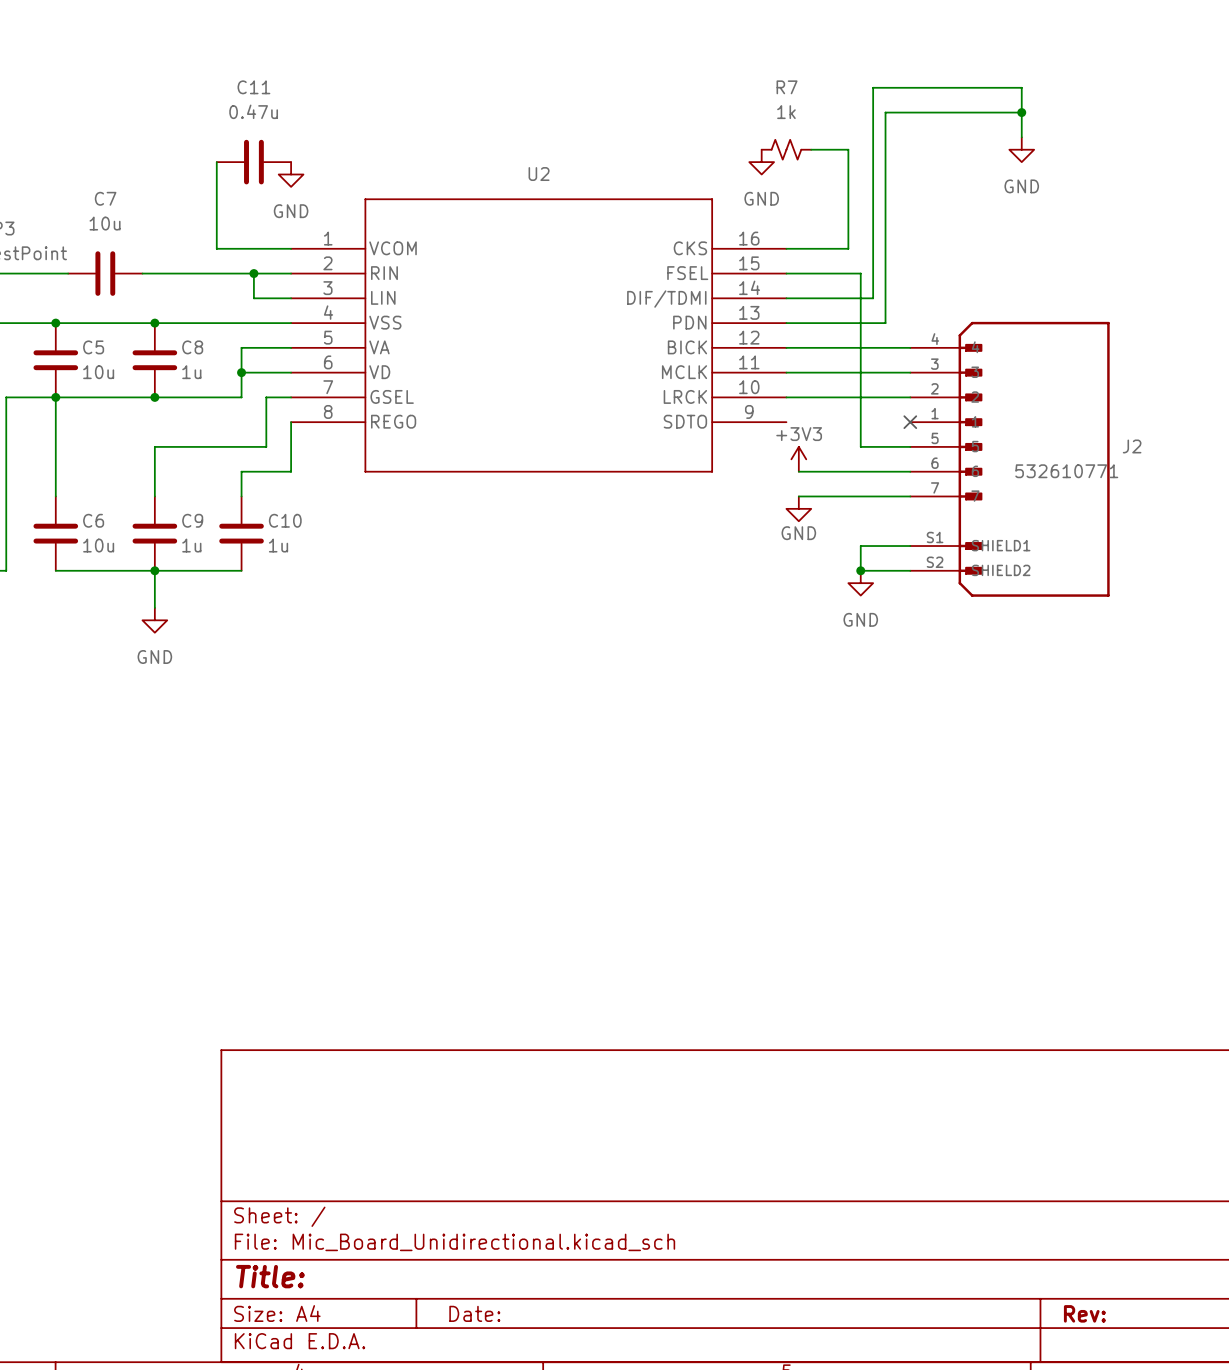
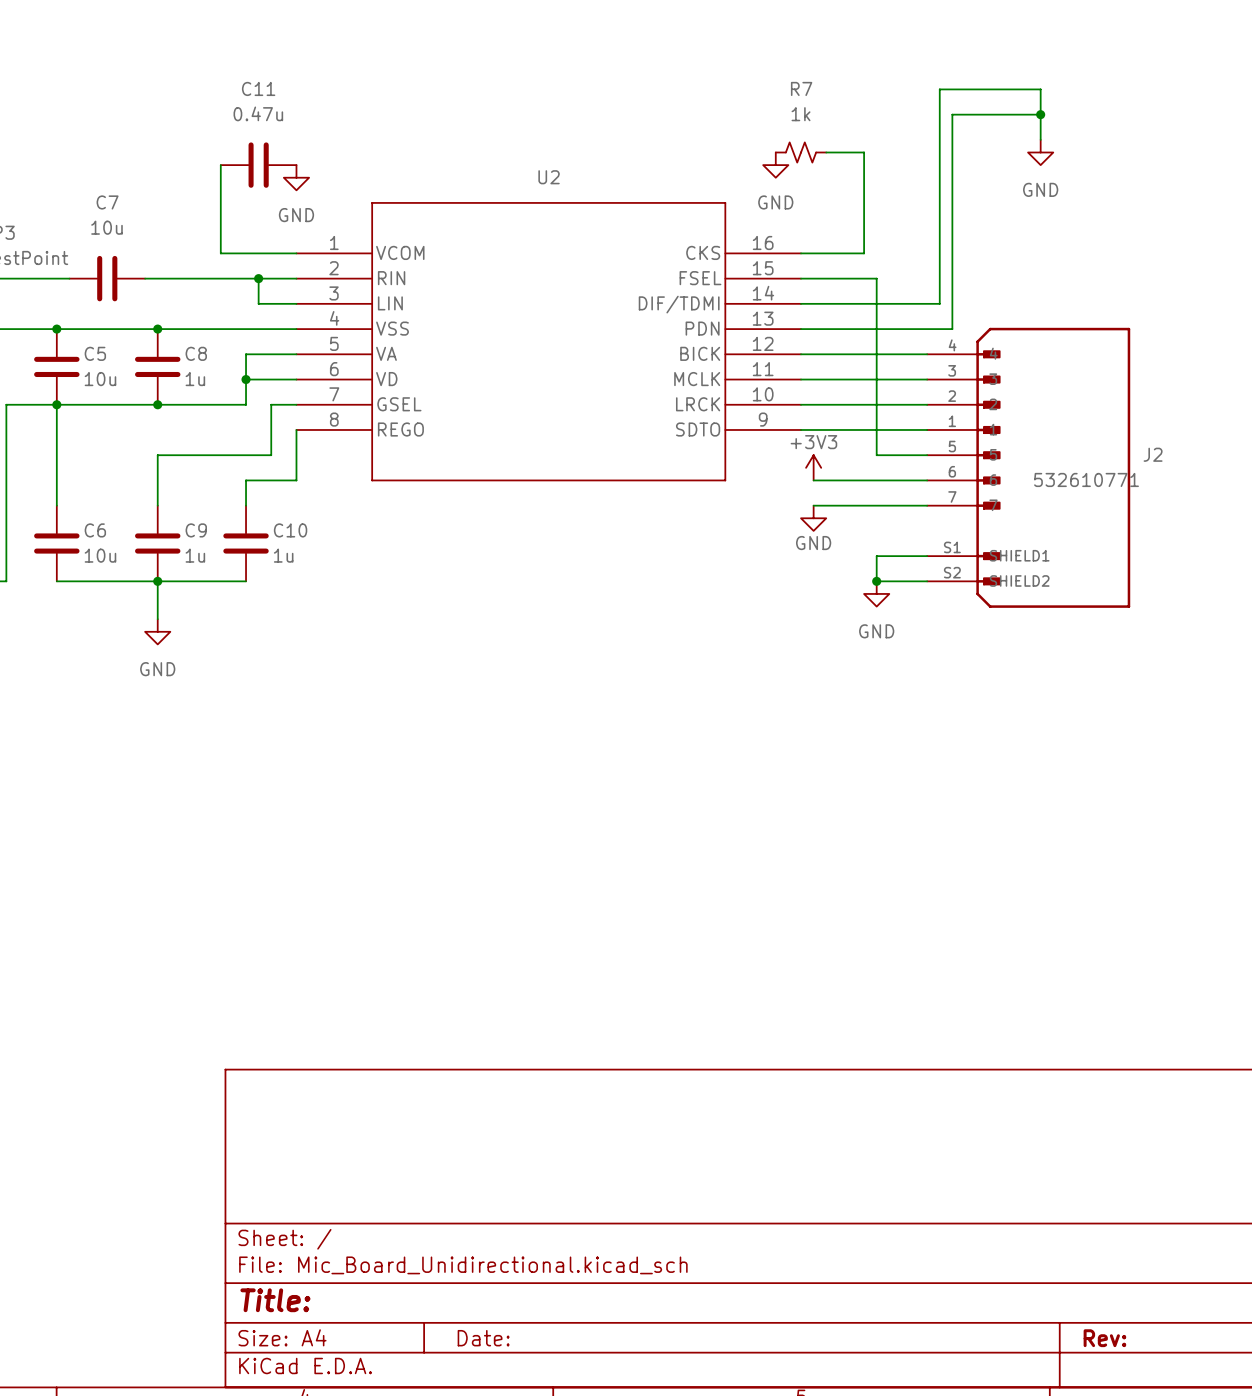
wire: (922, 87) (873, 87) (873, 298) -> (939, 89) (939, 303) (889, 303)
wire: (935, 112) (885, 112) (885, 323) -> (952, 114) (952, 329) (901, 329)
wire: none -> (801, 429) (927, 429)
no-connect mark: (910, 422) -> none

